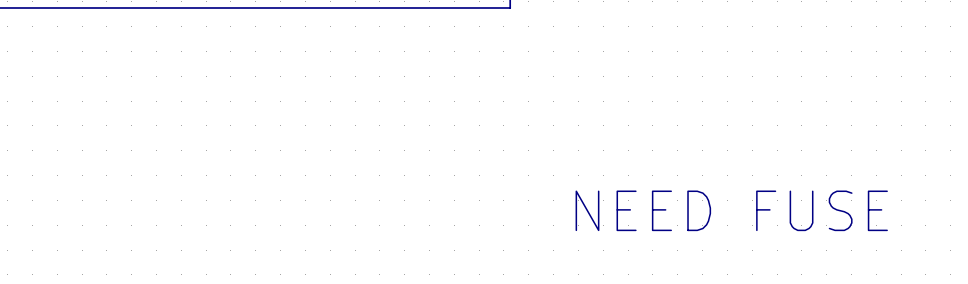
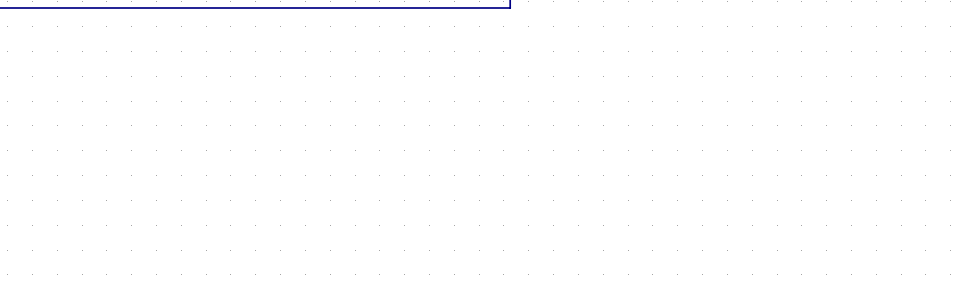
text: NEED FUSE (731, 210) -> none

